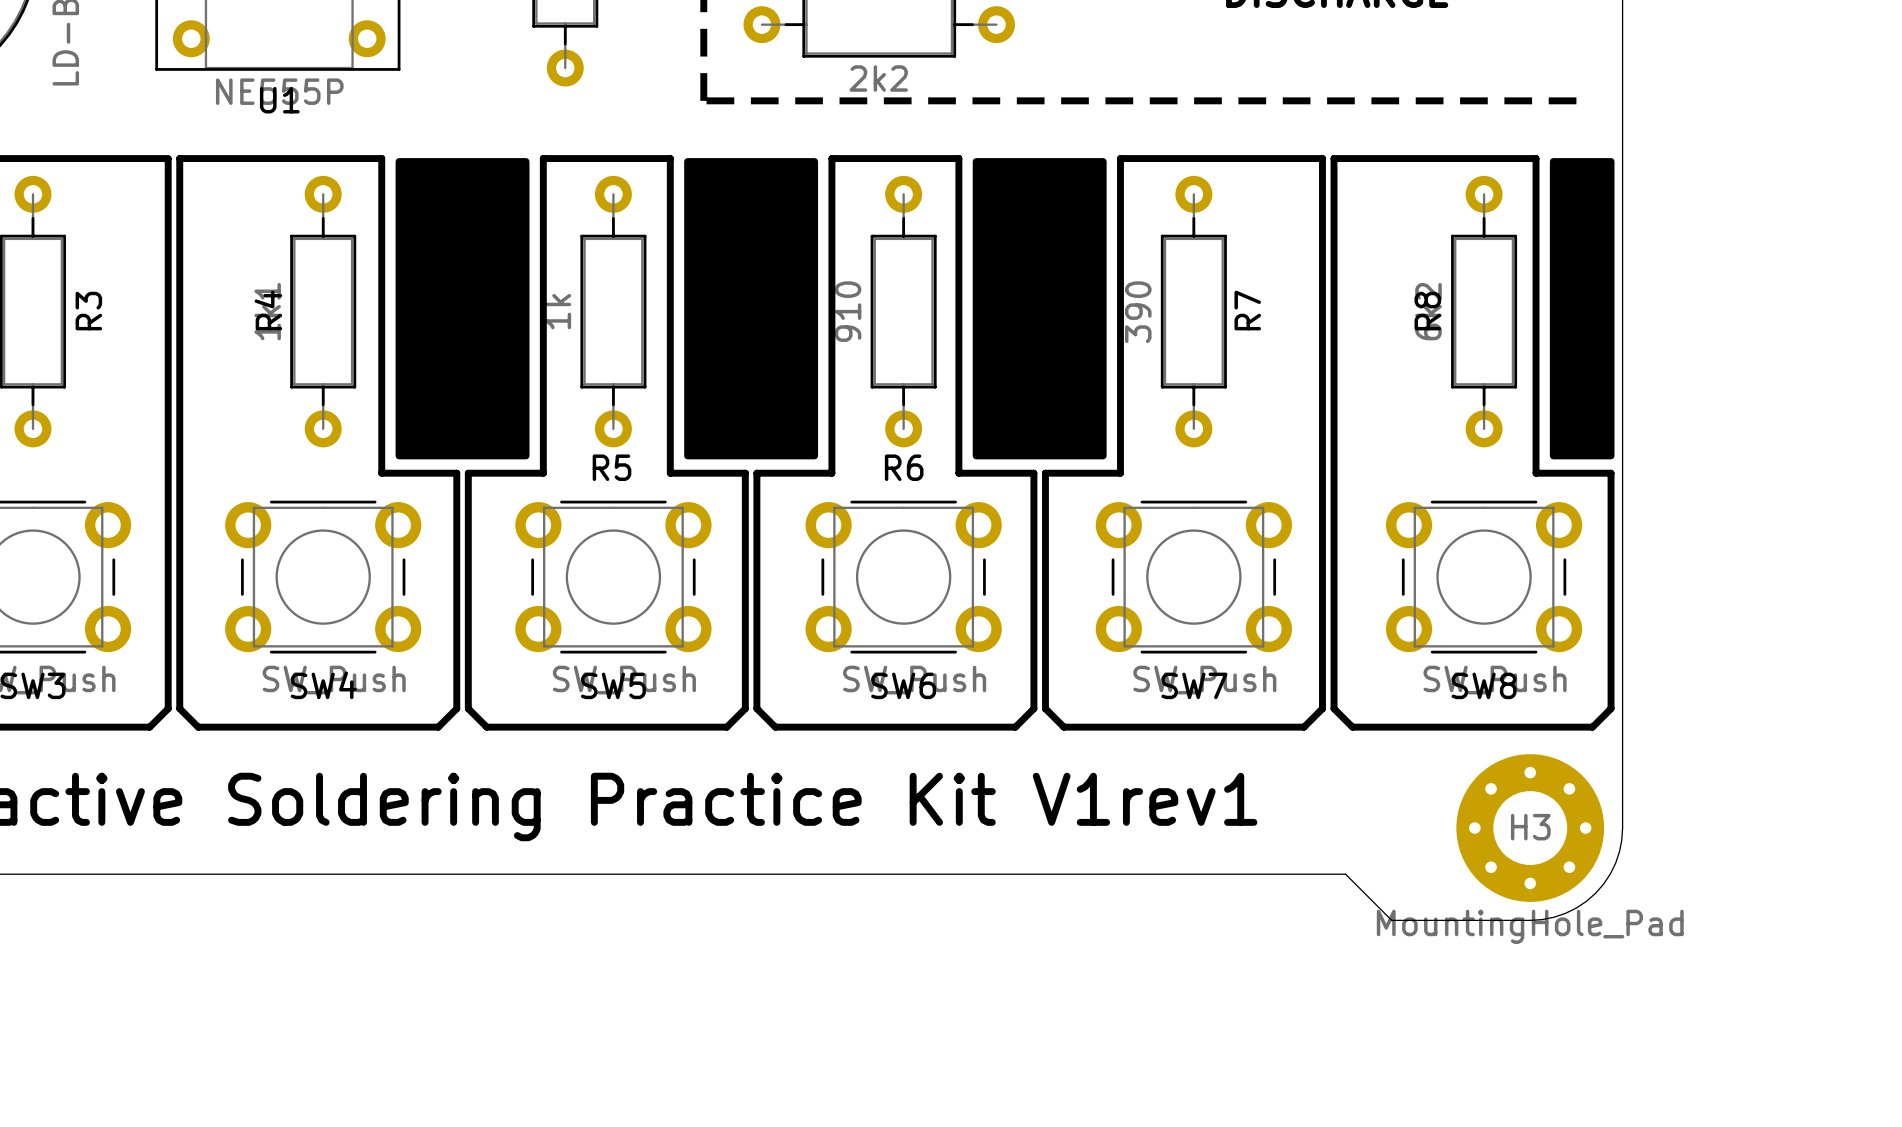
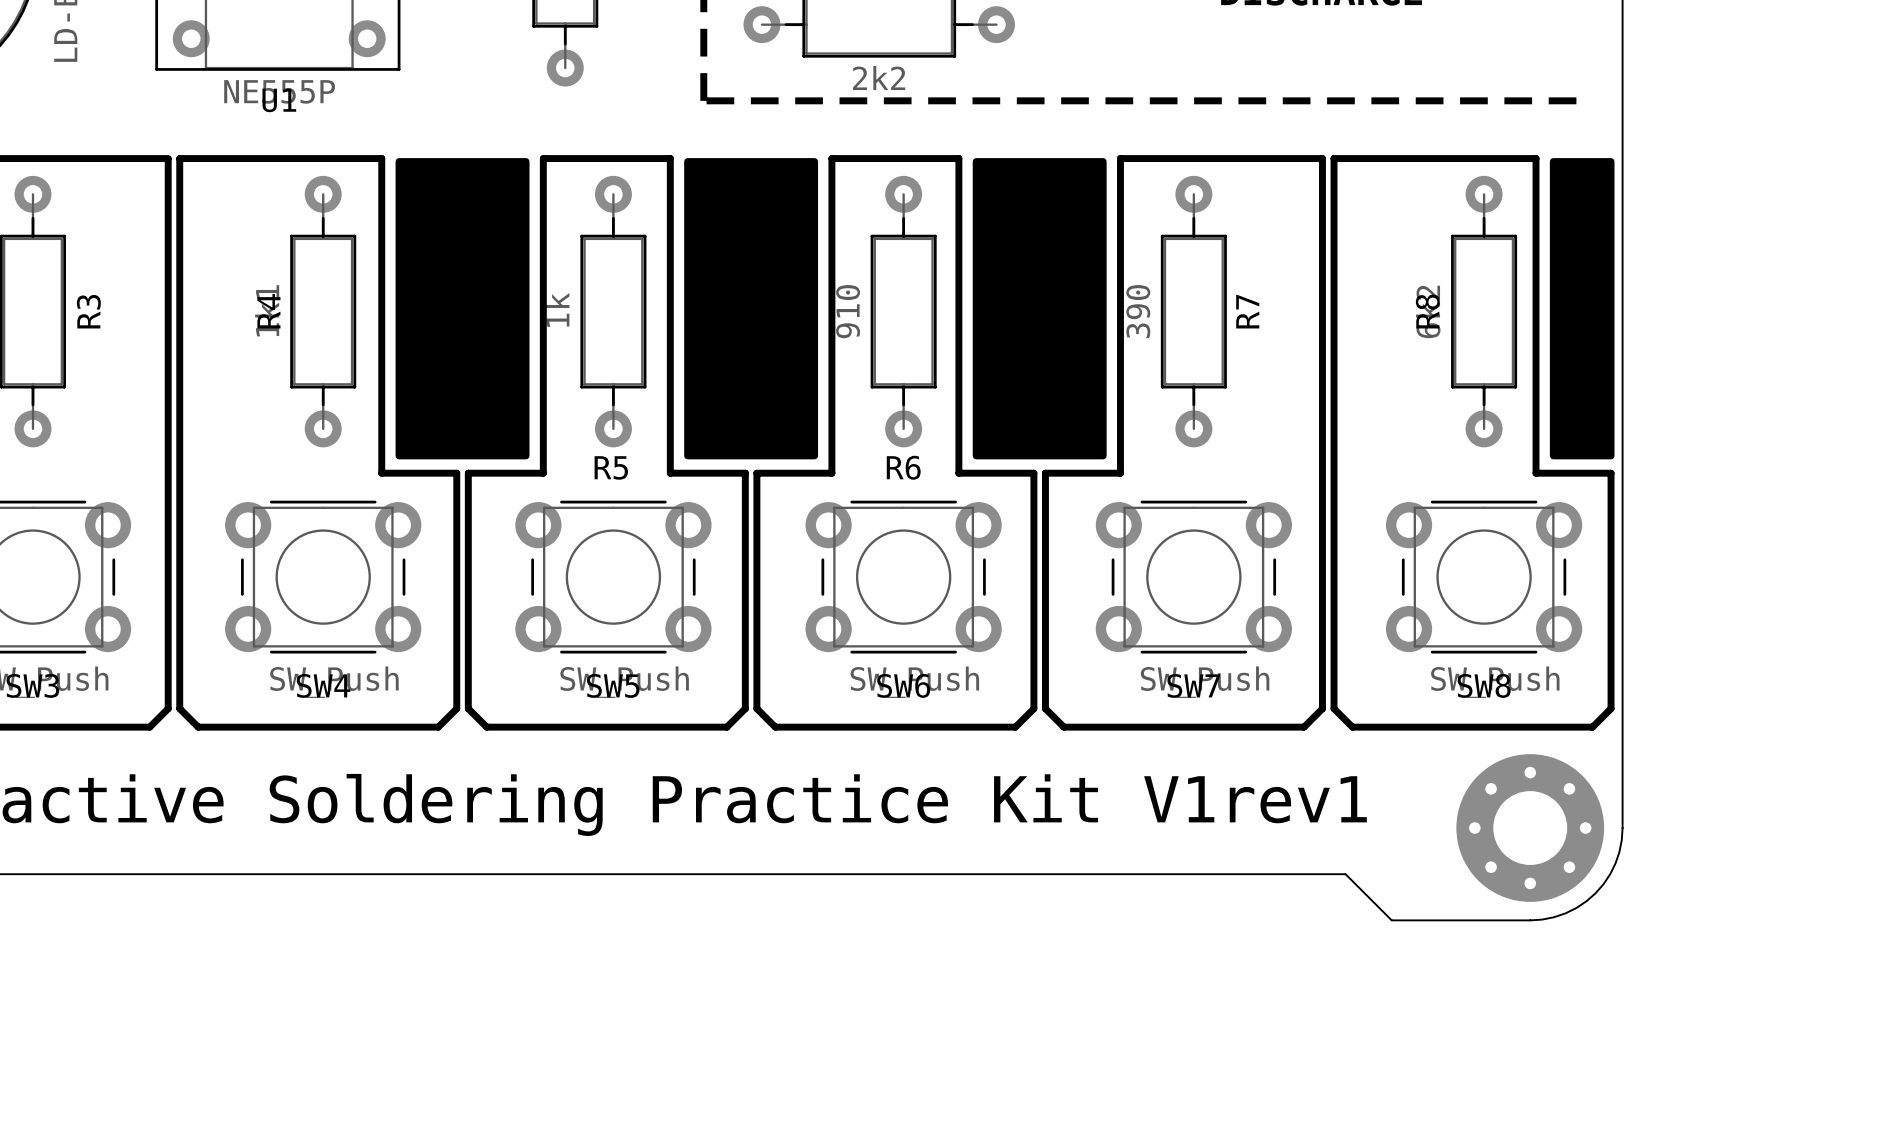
H3 name: H3 (1530, 827) -> none
H3 value: MountingHole_Pad (1530, 926) -> none

